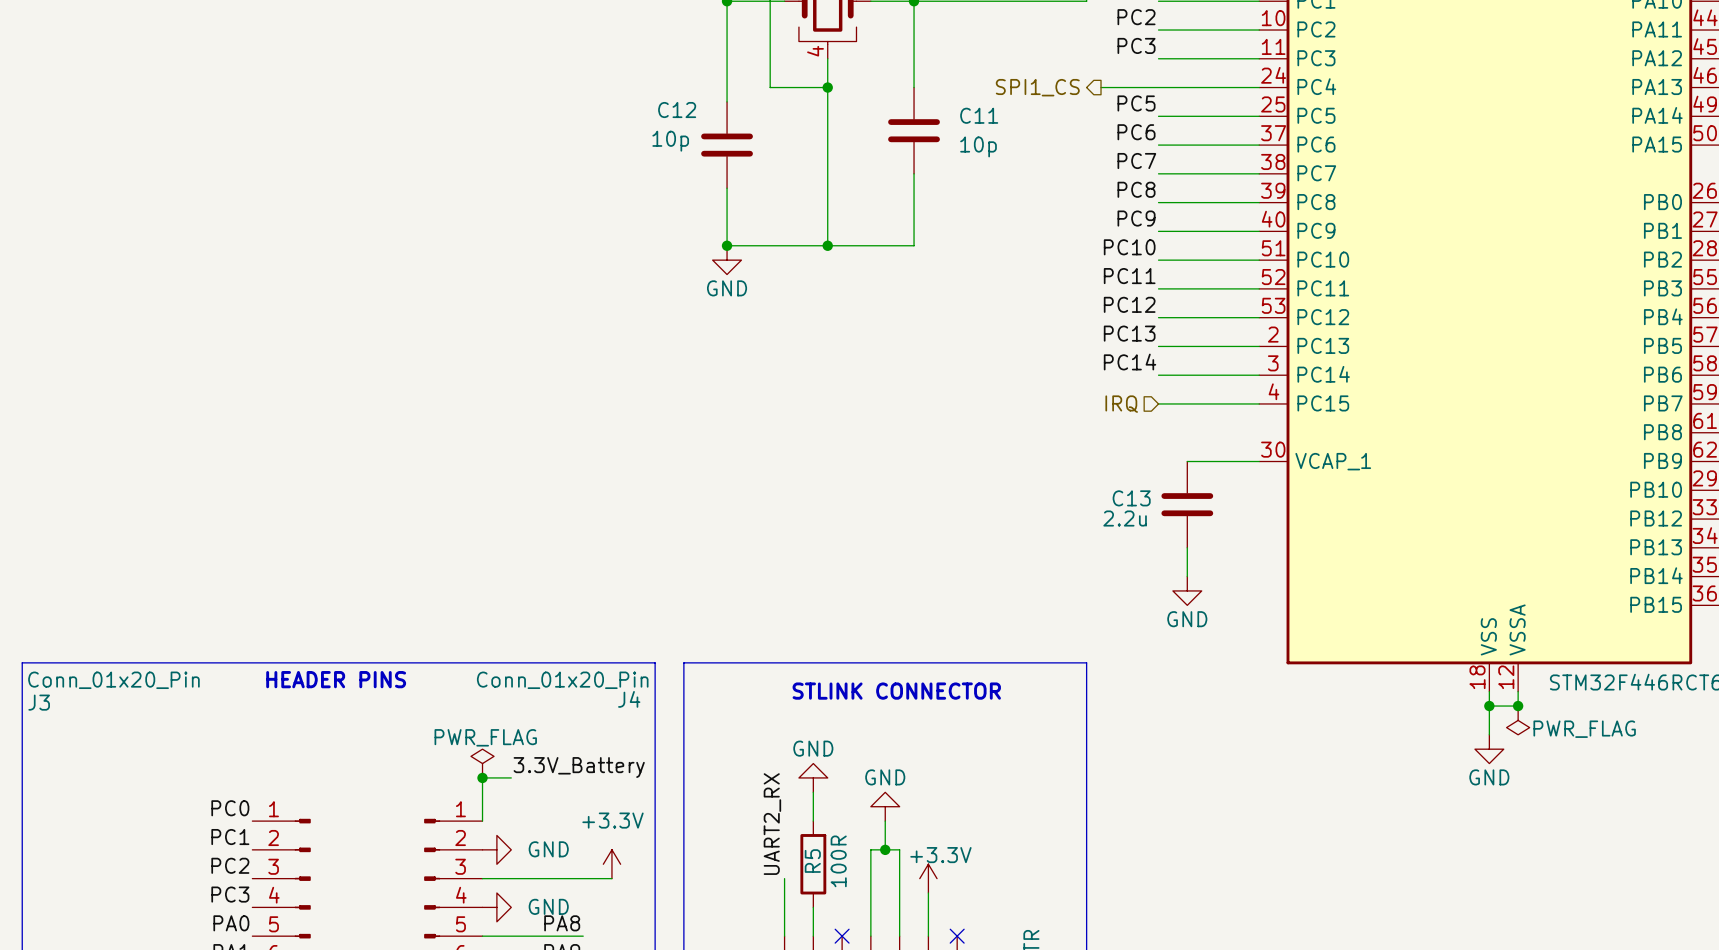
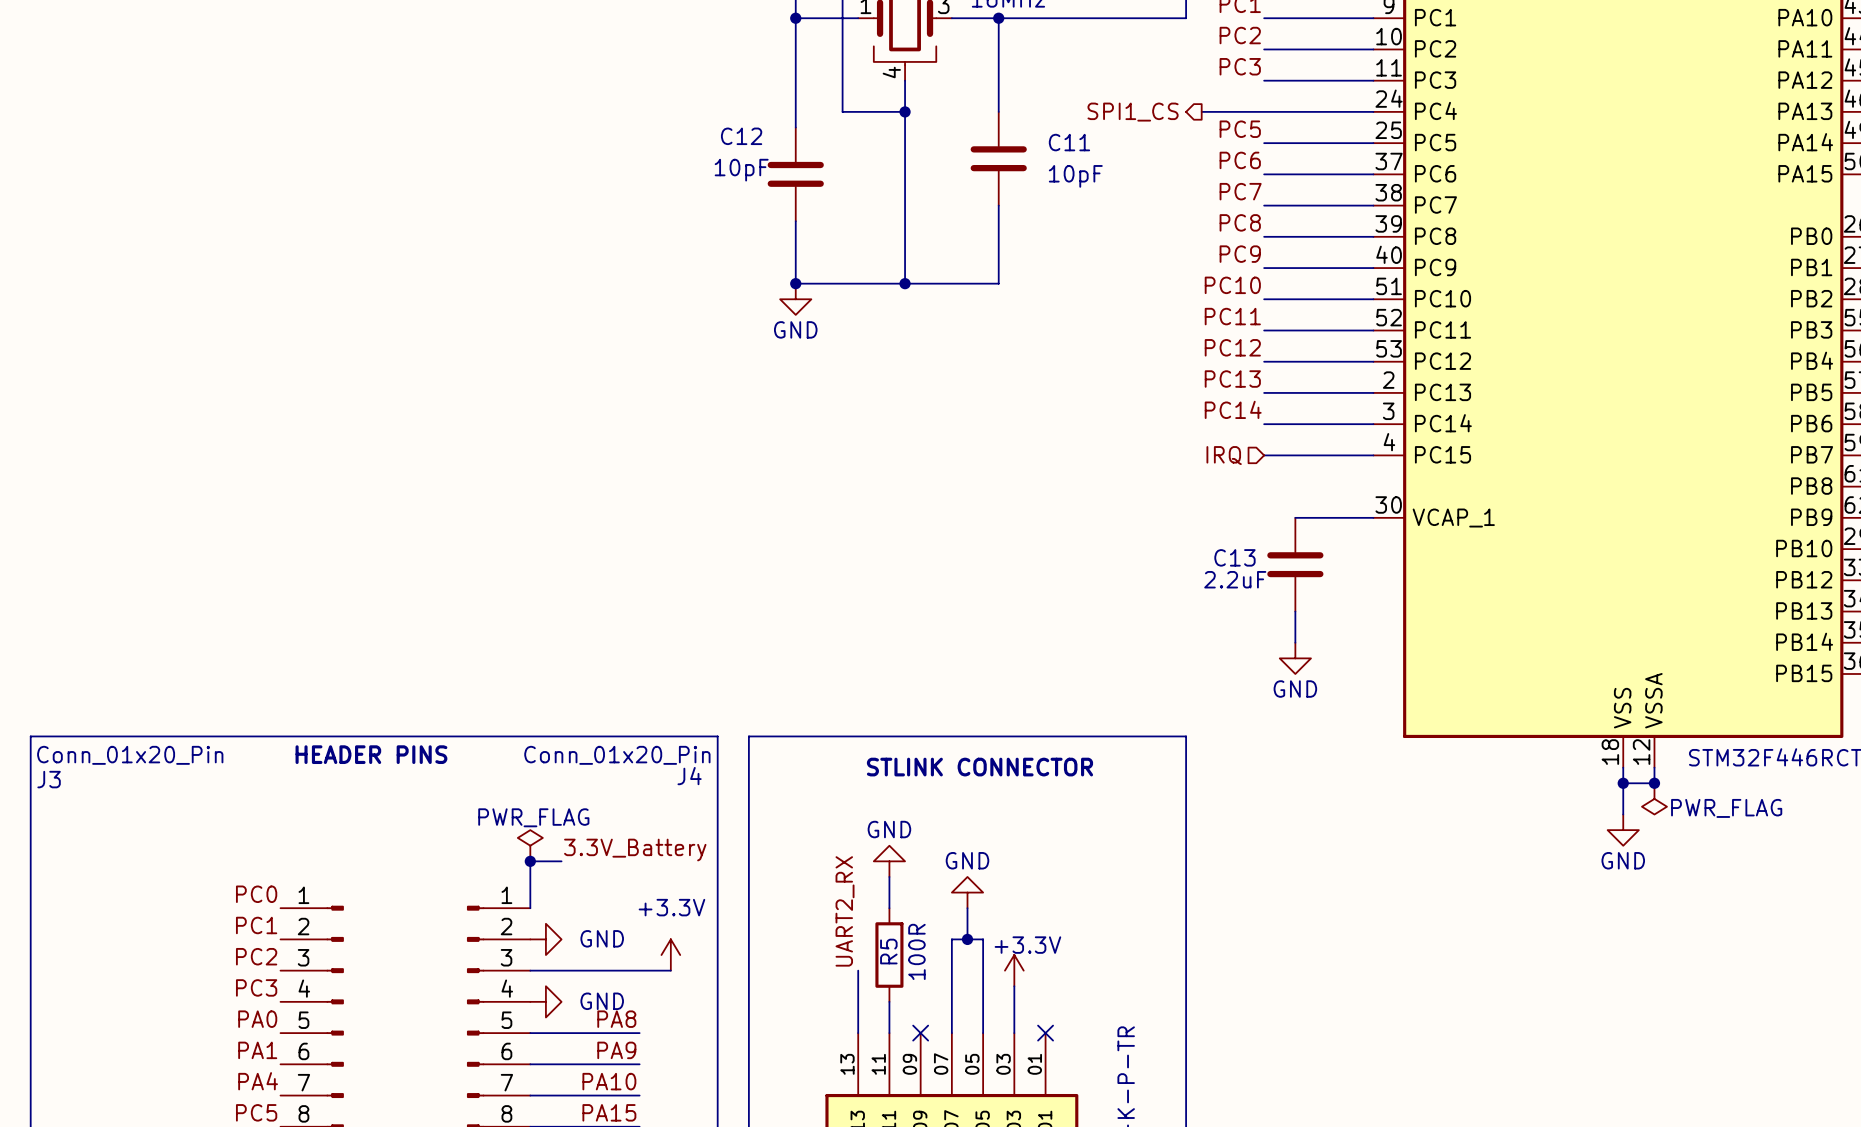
C12 value: 10p (670, 141) -> 10pF (741, 170)
C11 value: 10p (978, 146) -> 10pF (1075, 176)
C13 value: 2.2u (1125, 518) -> 2.2uF (1235, 579)

